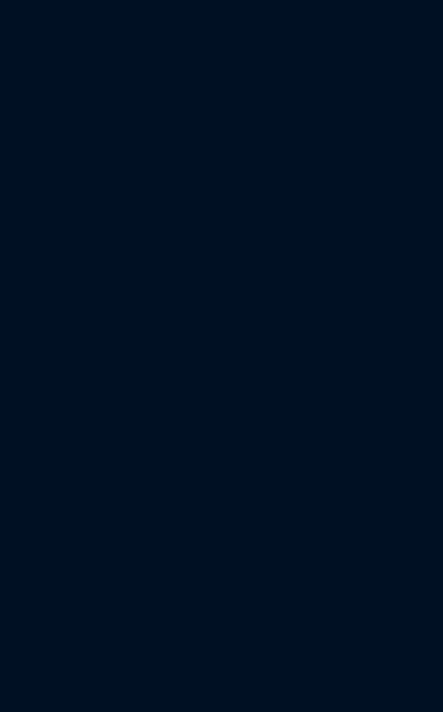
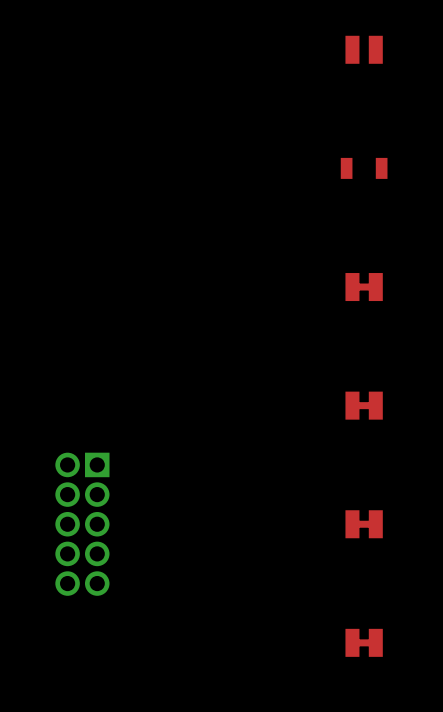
part: none -> (364, 49)
part: none -> (364, 168)
part: none -> (364, 287)
part: none -> (364, 405)
part: none -> (82, 524)
part: none -> (364, 524)
part: none -> (364, 642)

